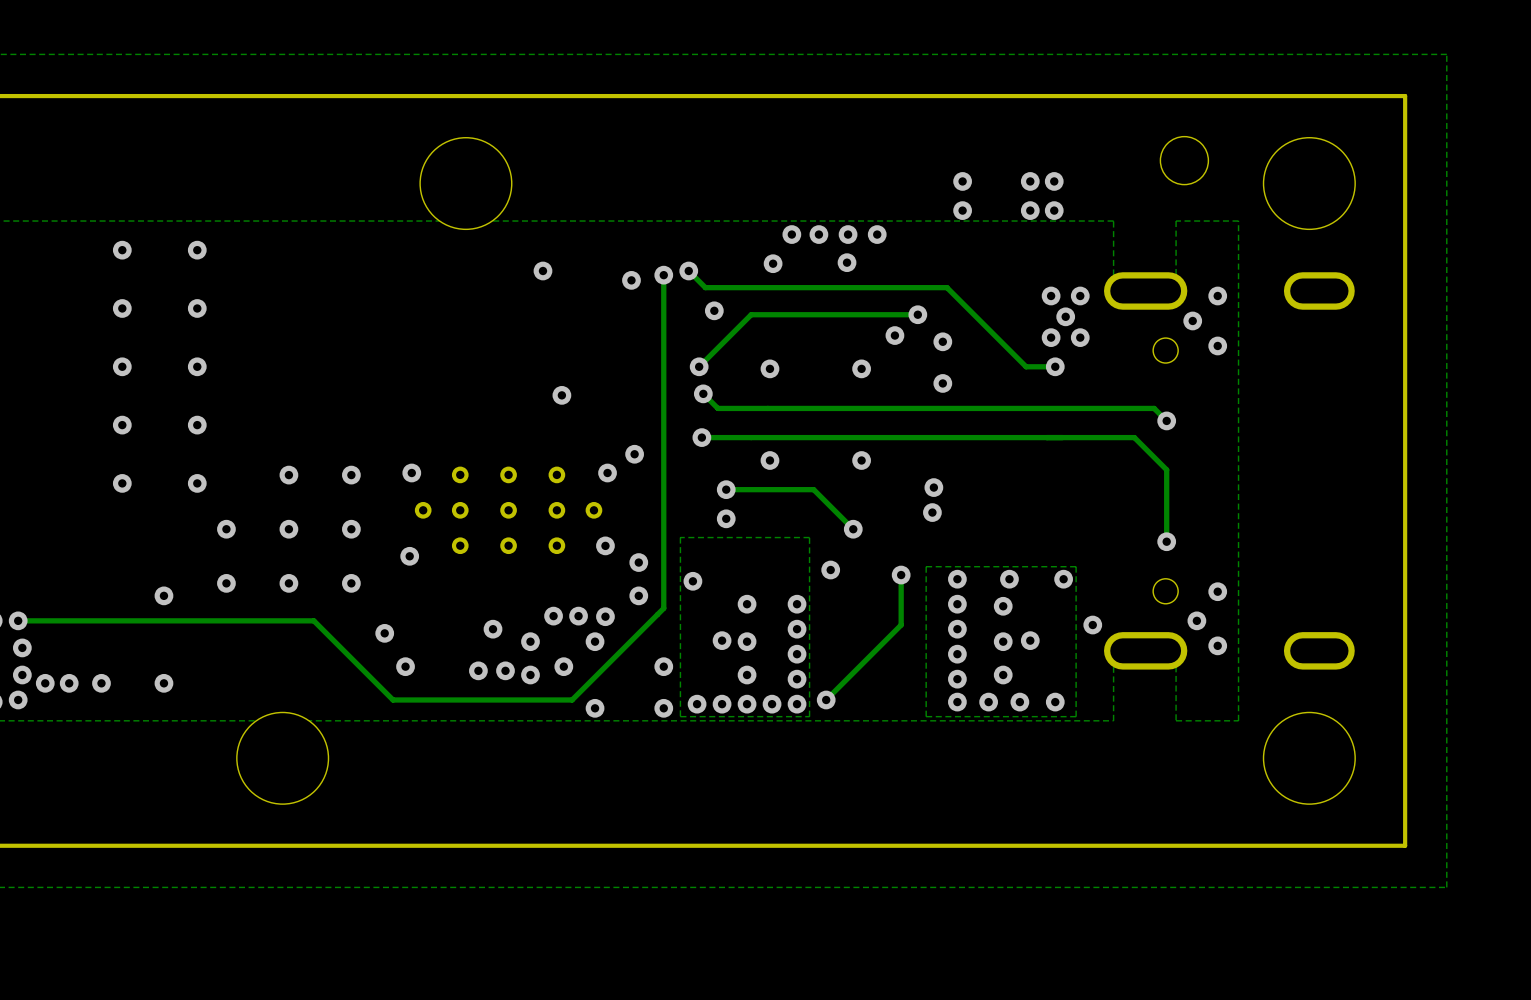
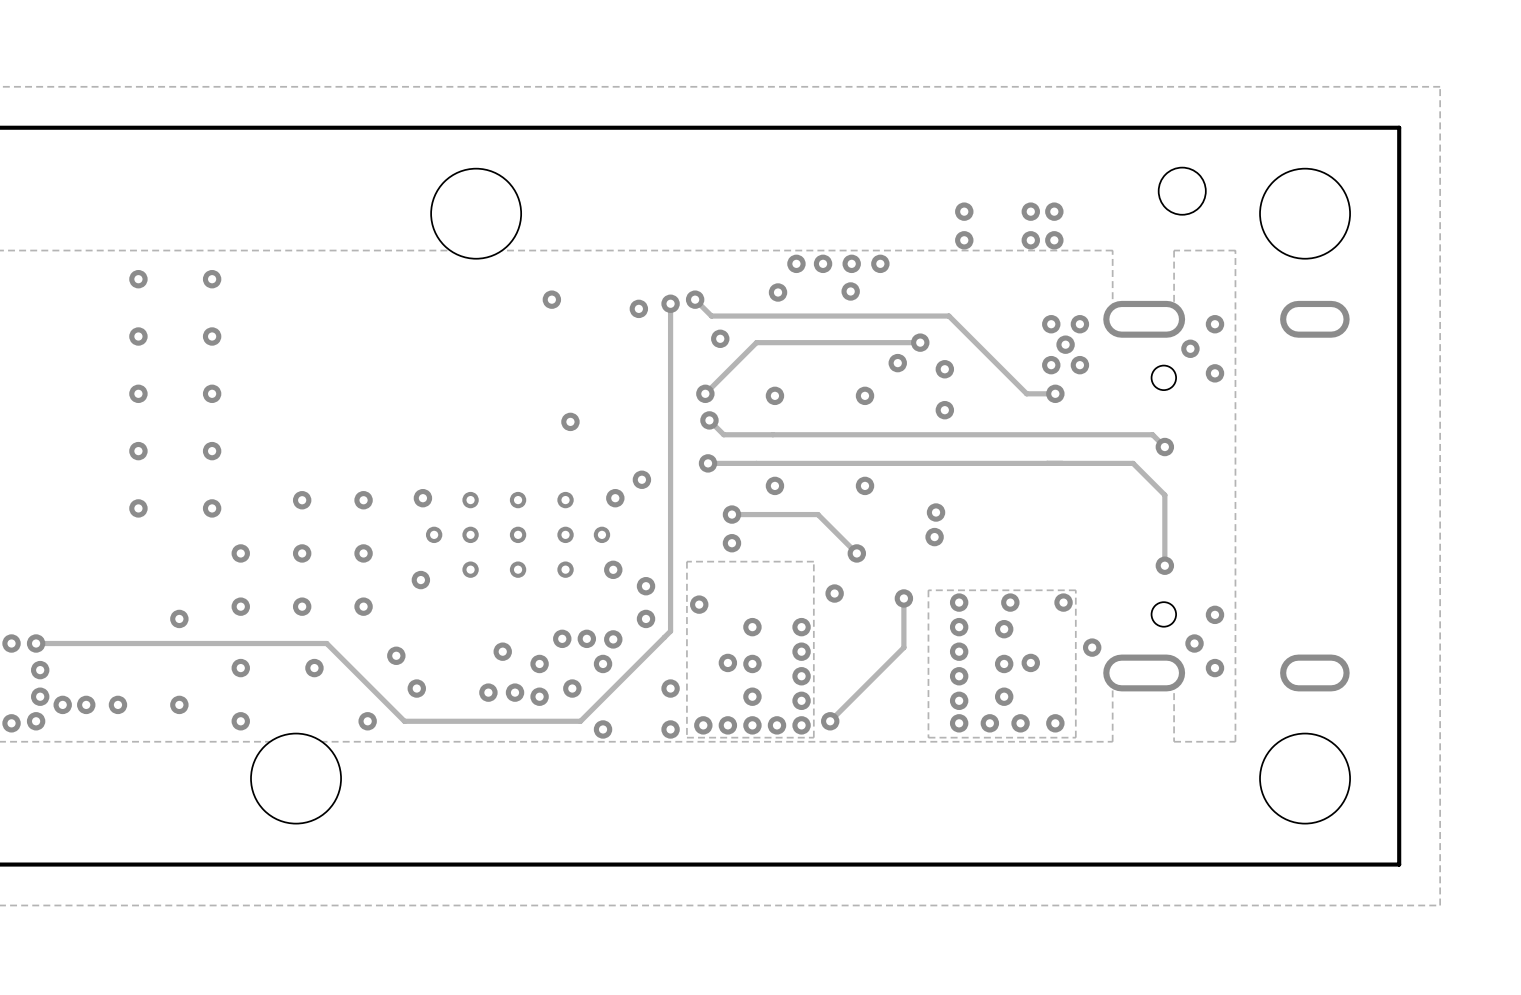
via: none -> (240, 668)
via: none -> (314, 668)
via: none -> (240, 721)
via: none -> (367, 721)

